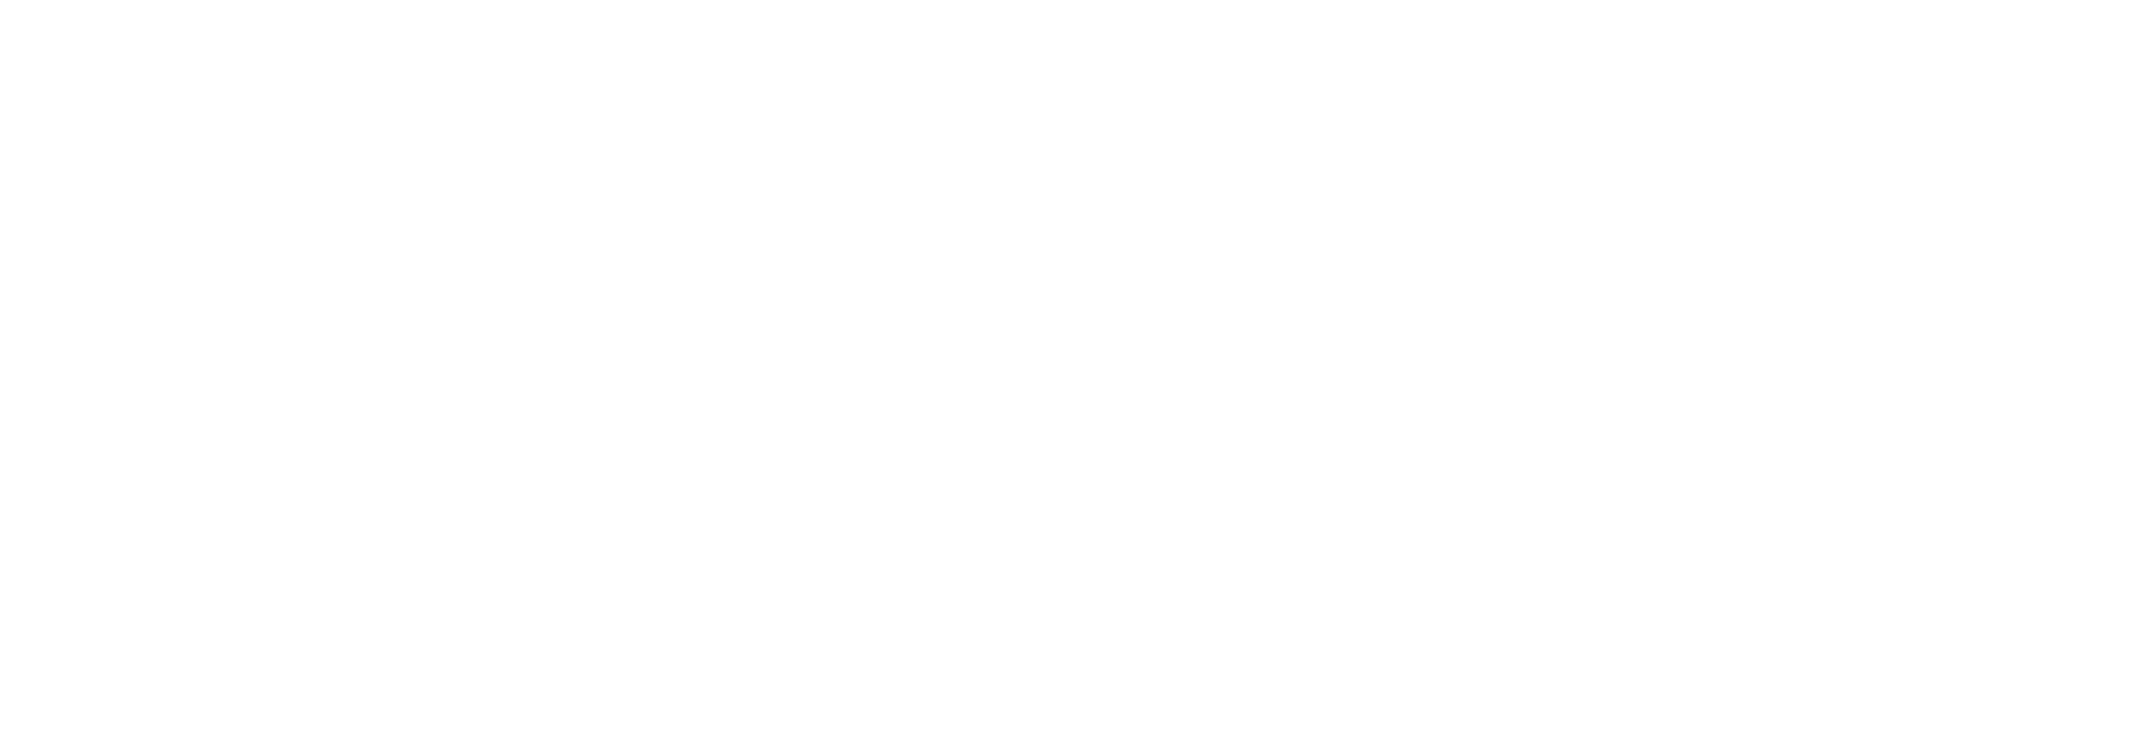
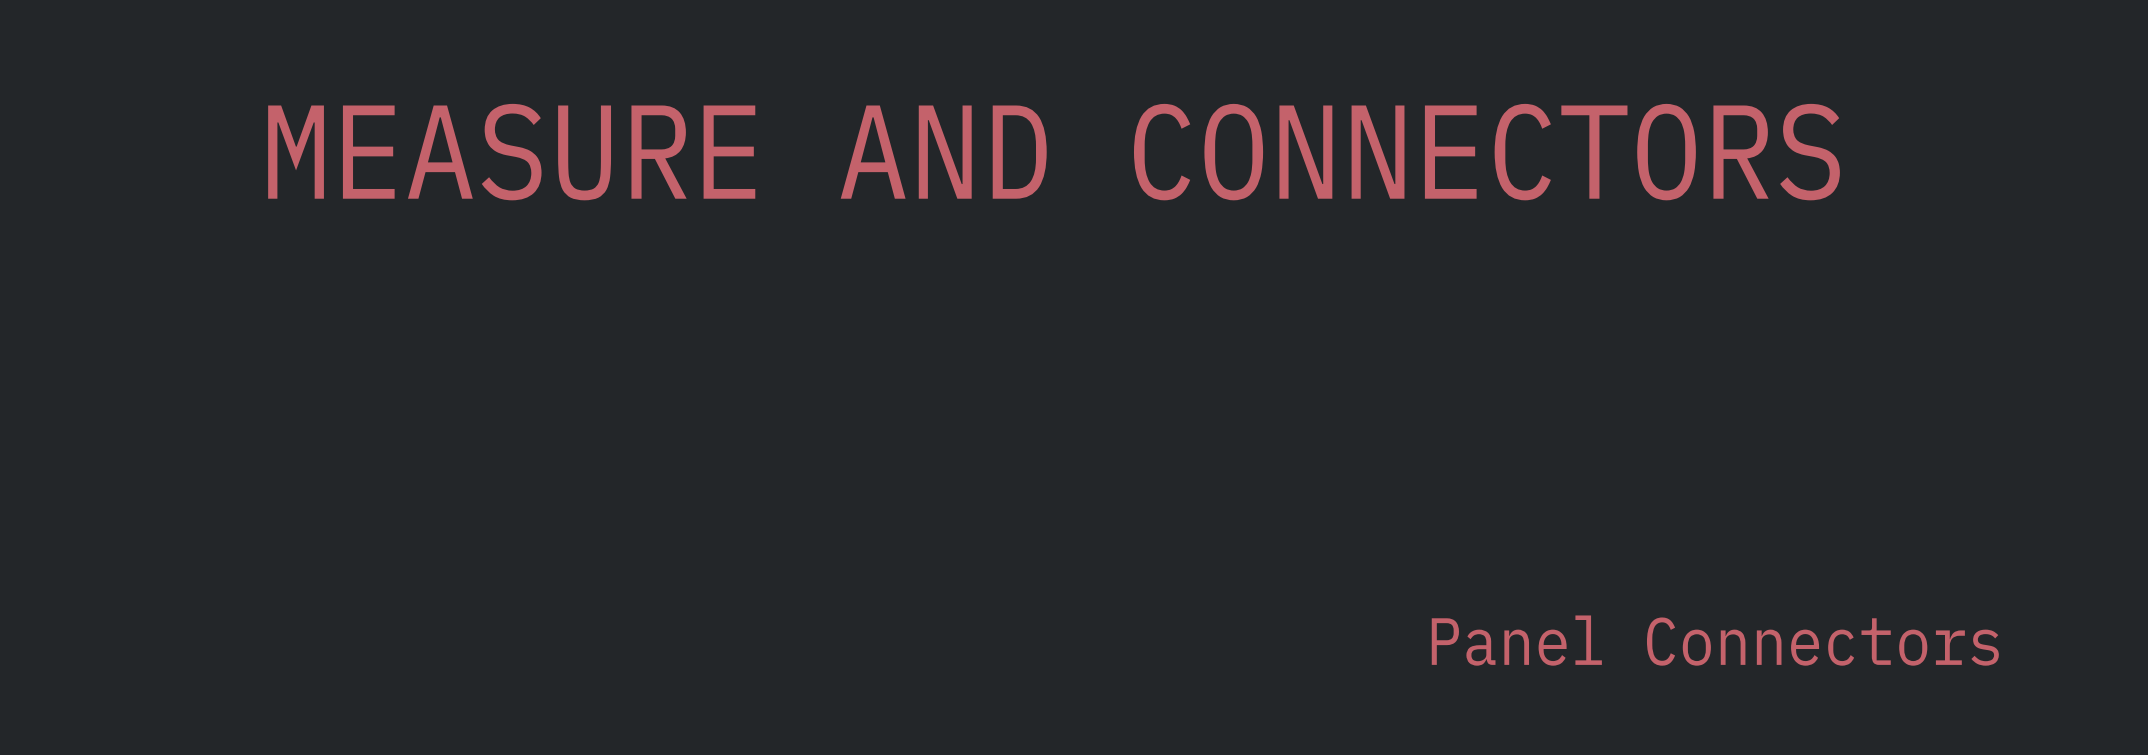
text: none -> MEASURE AND CONNECTORS (1054, 152)
text: none -> Panel Connectors (1715, 640)

